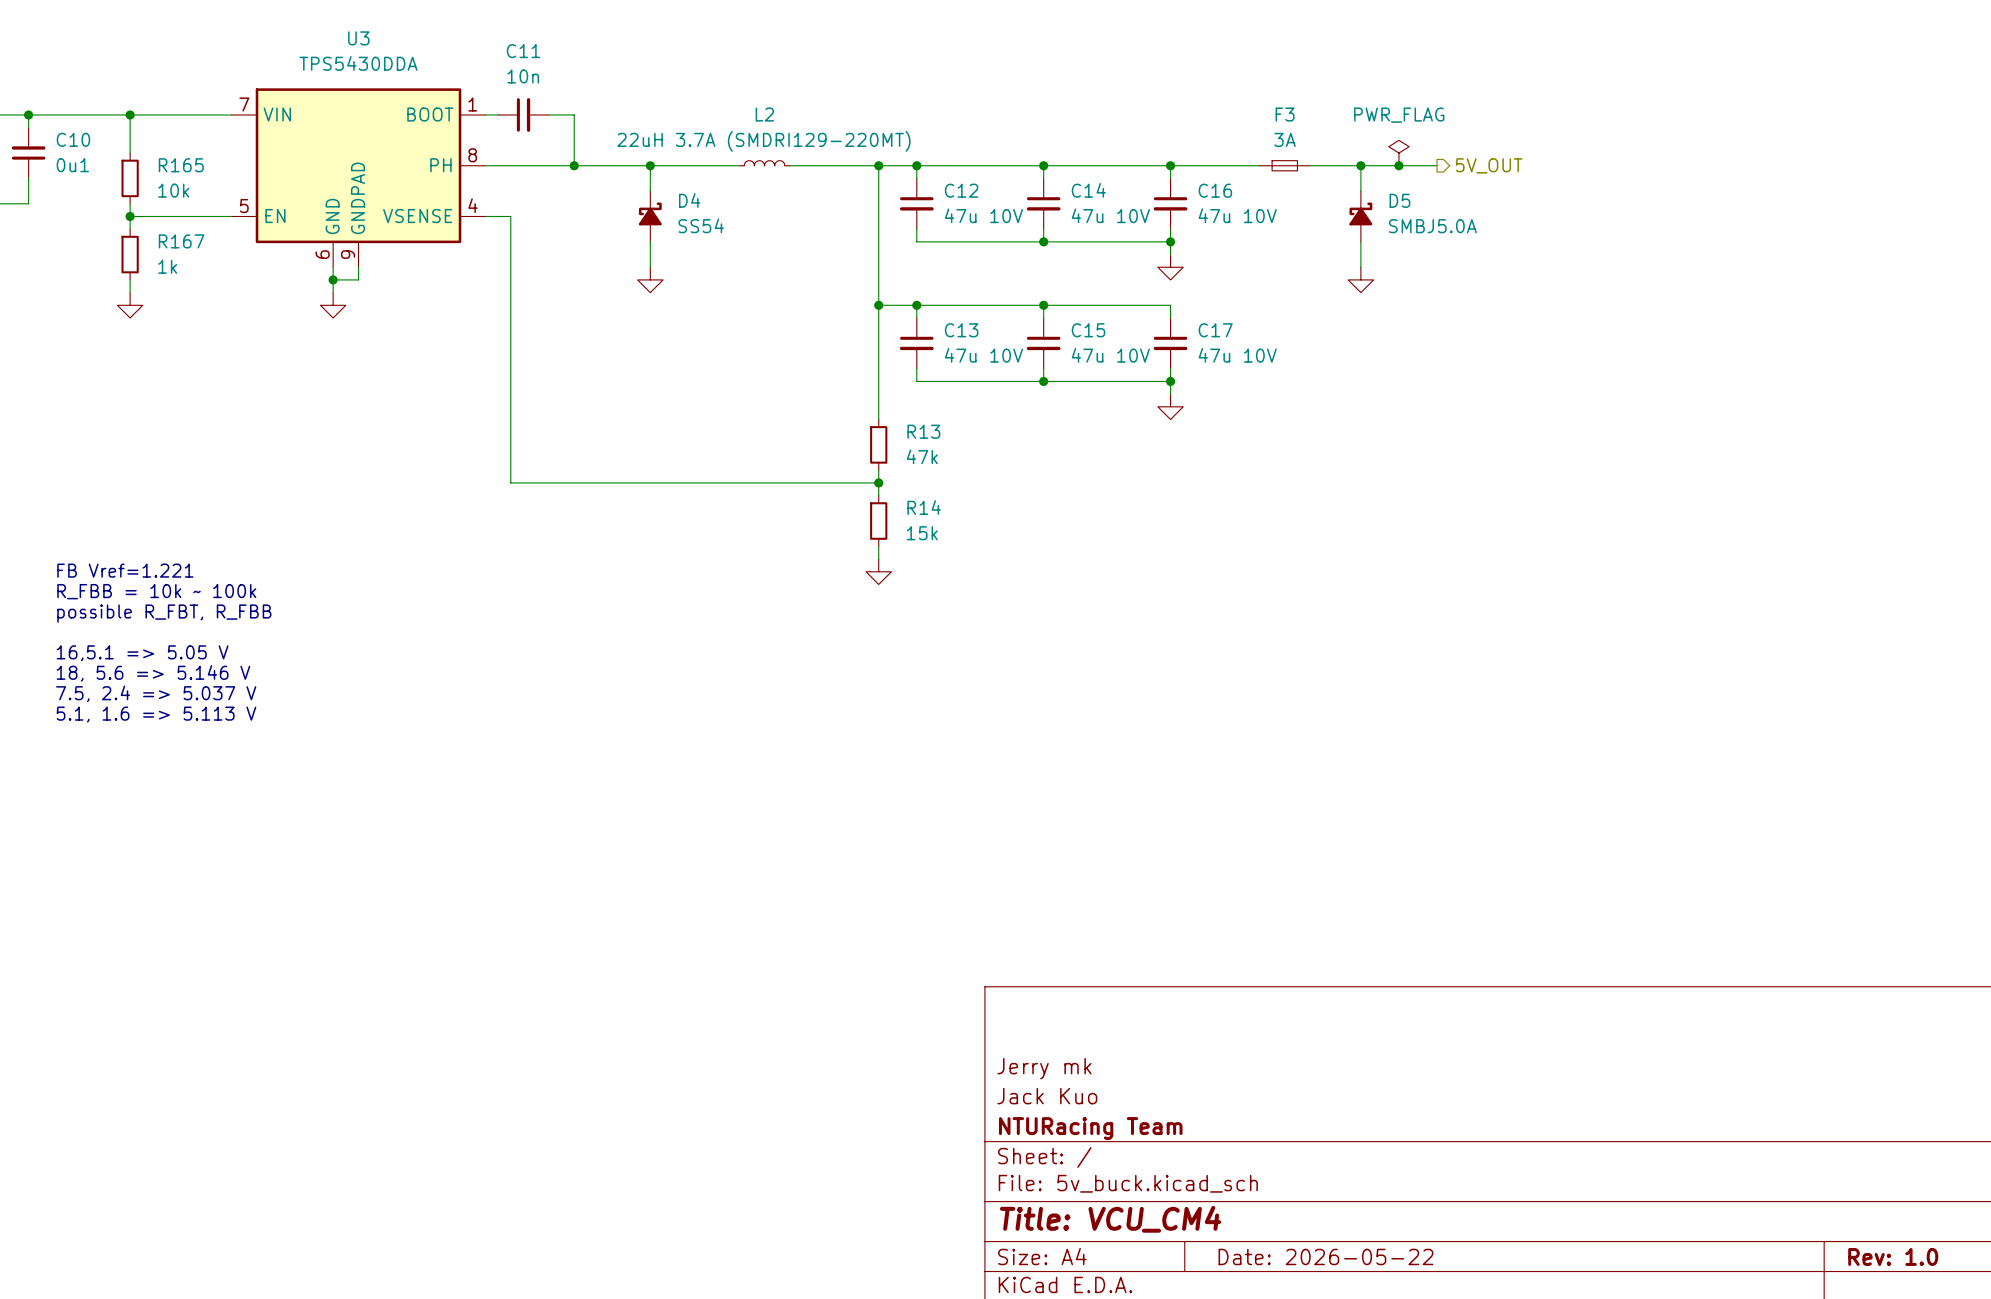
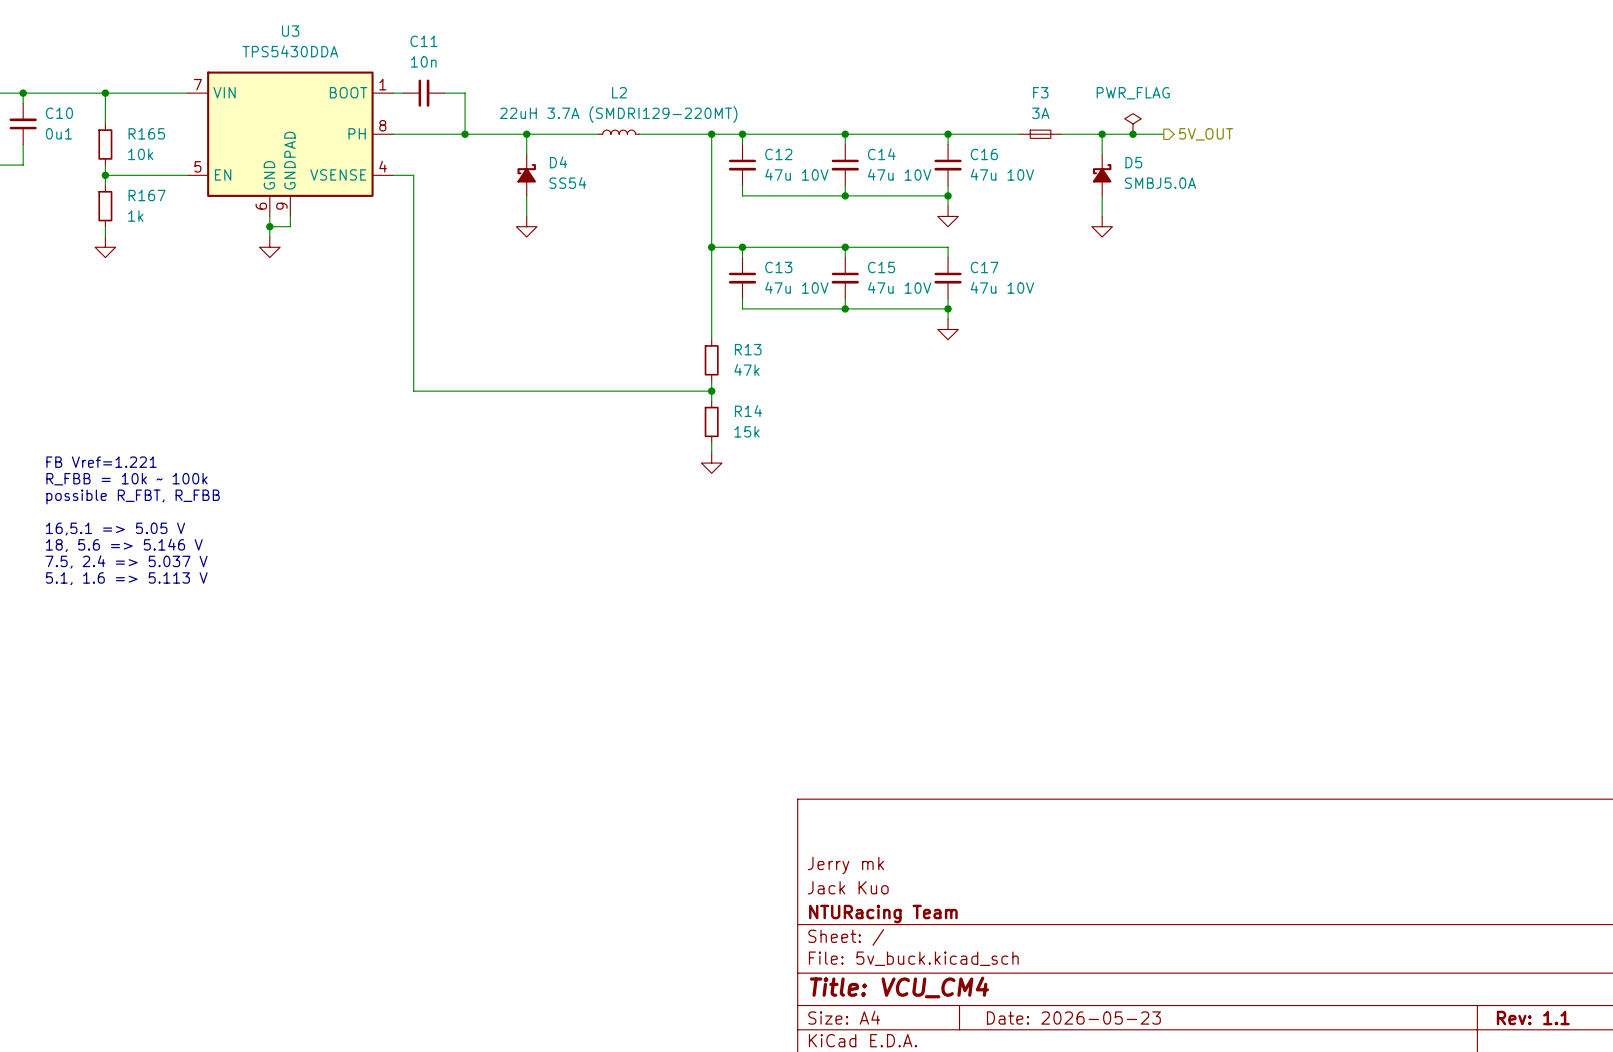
title block: Date: 2026-05-22 (1325, 1256) -> Date: 2026-05-23 (1073, 1018)
title block: Rev: 1.0 (1893, 1256) -> Rev: 1.1 (1533, 1018)

